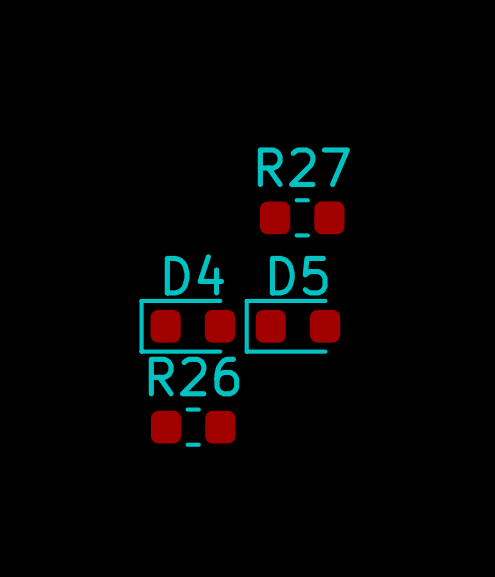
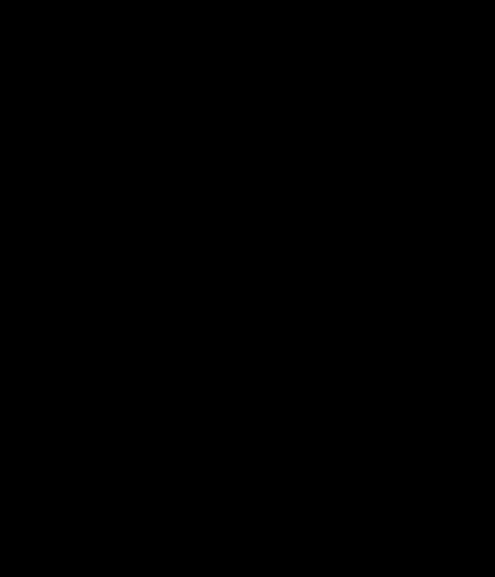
R27: (302, 217) -> none
D4: (187, 326) -> none
D5: (292, 326) -> none
R26: (193, 427) -> none

